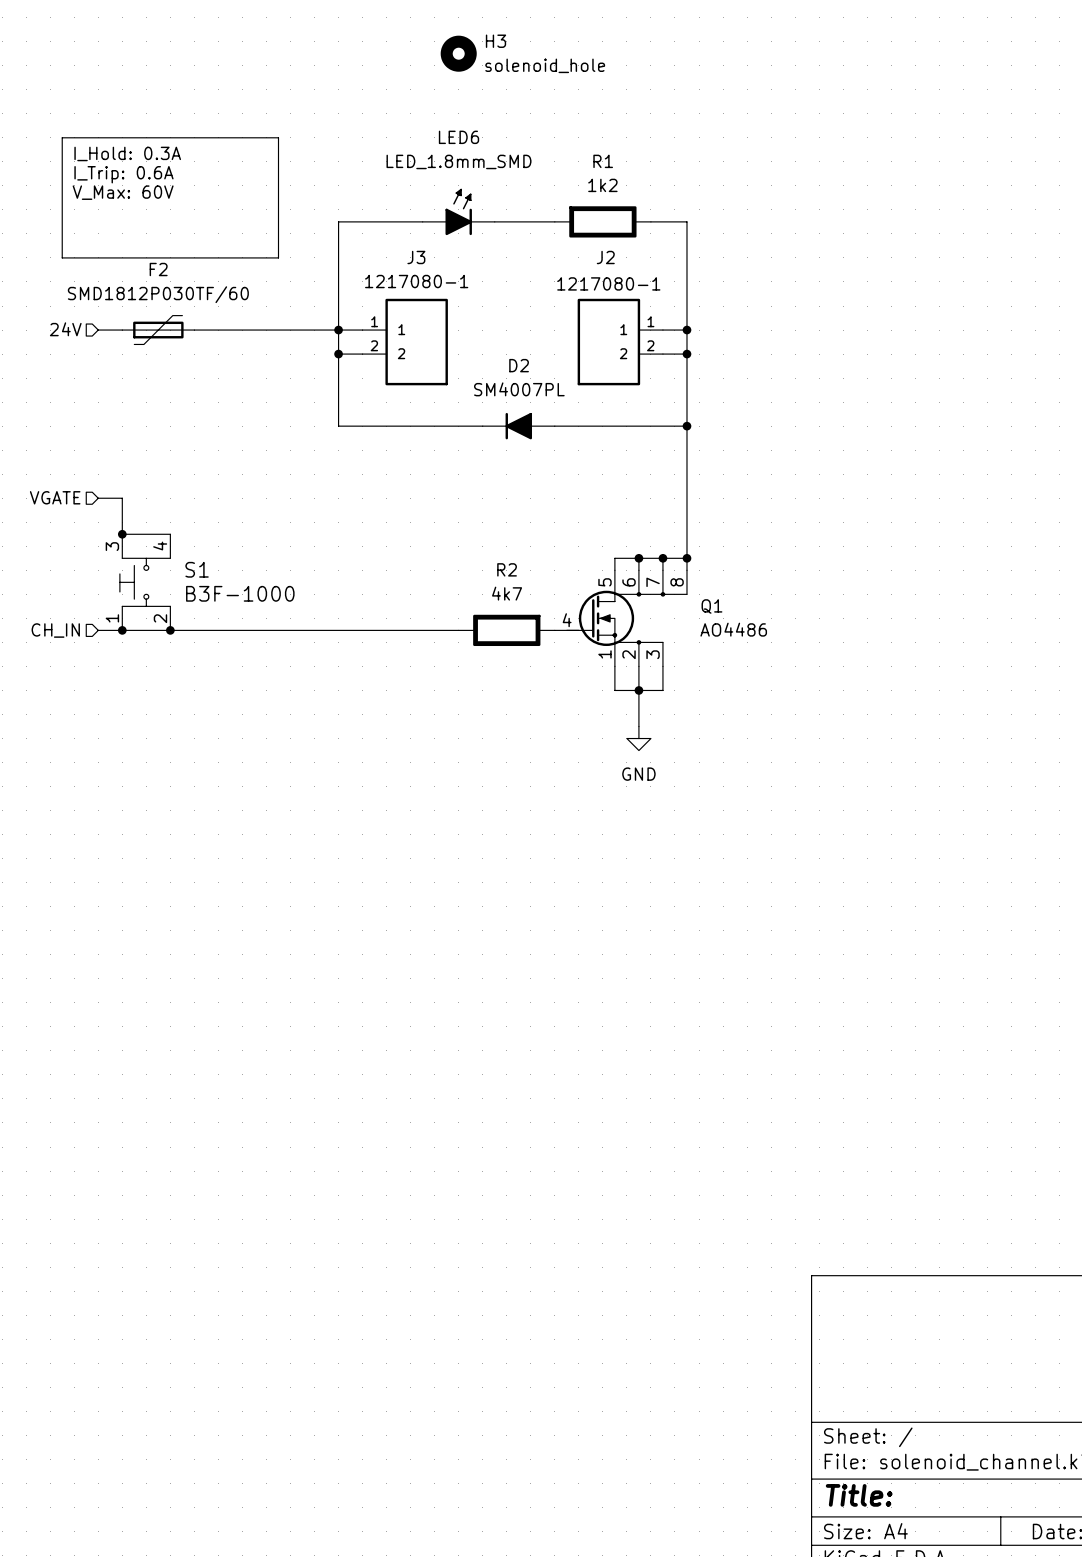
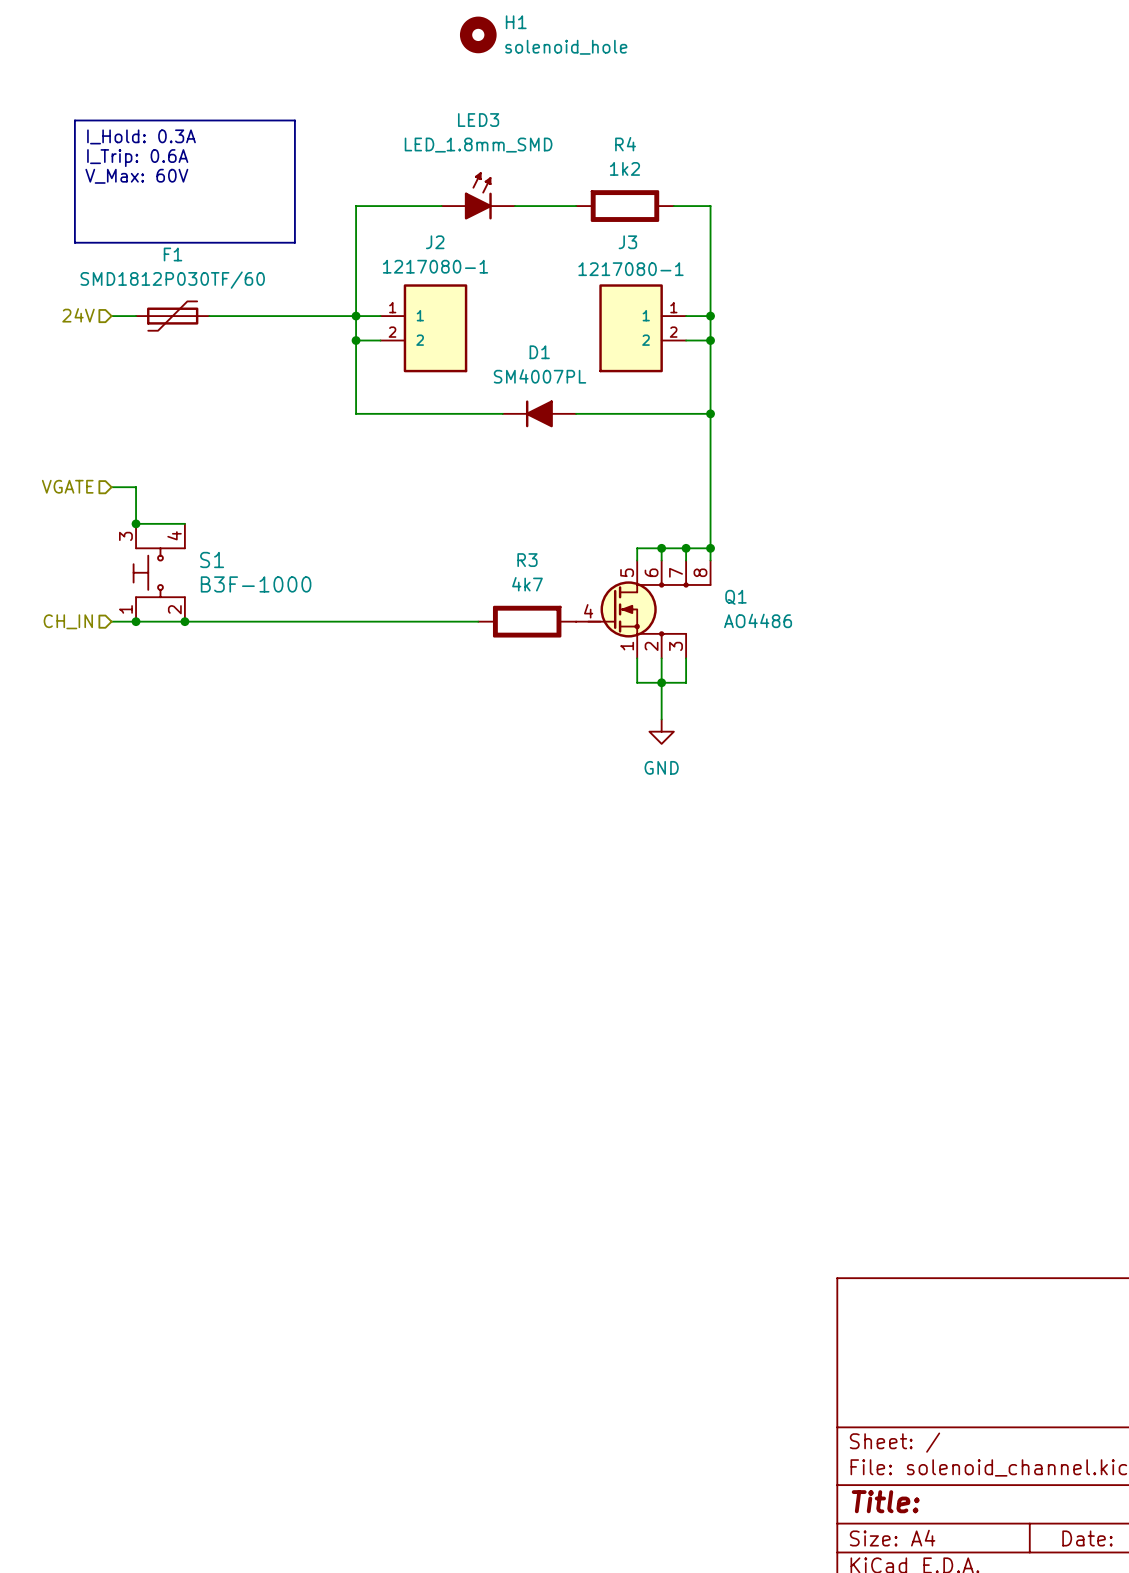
H3 name: H3 (495, 41) -> H1 (516, 22)
LED6 name: LED6 (459, 137) -> LED3 (478, 120)
R1 name: R1 (603, 161) -> R4 (625, 144)
J3 name: J3 (416, 257) -> J2 (435, 242)
J2 name: J2 (605, 257) -> J3 (627, 242)
F2 name: F2 (158, 269) -> F1 (172, 254)
D2 name: D2 (519, 365) -> D1 (539, 352)
R2 name: R2 (507, 569) -> R3 (527, 560)

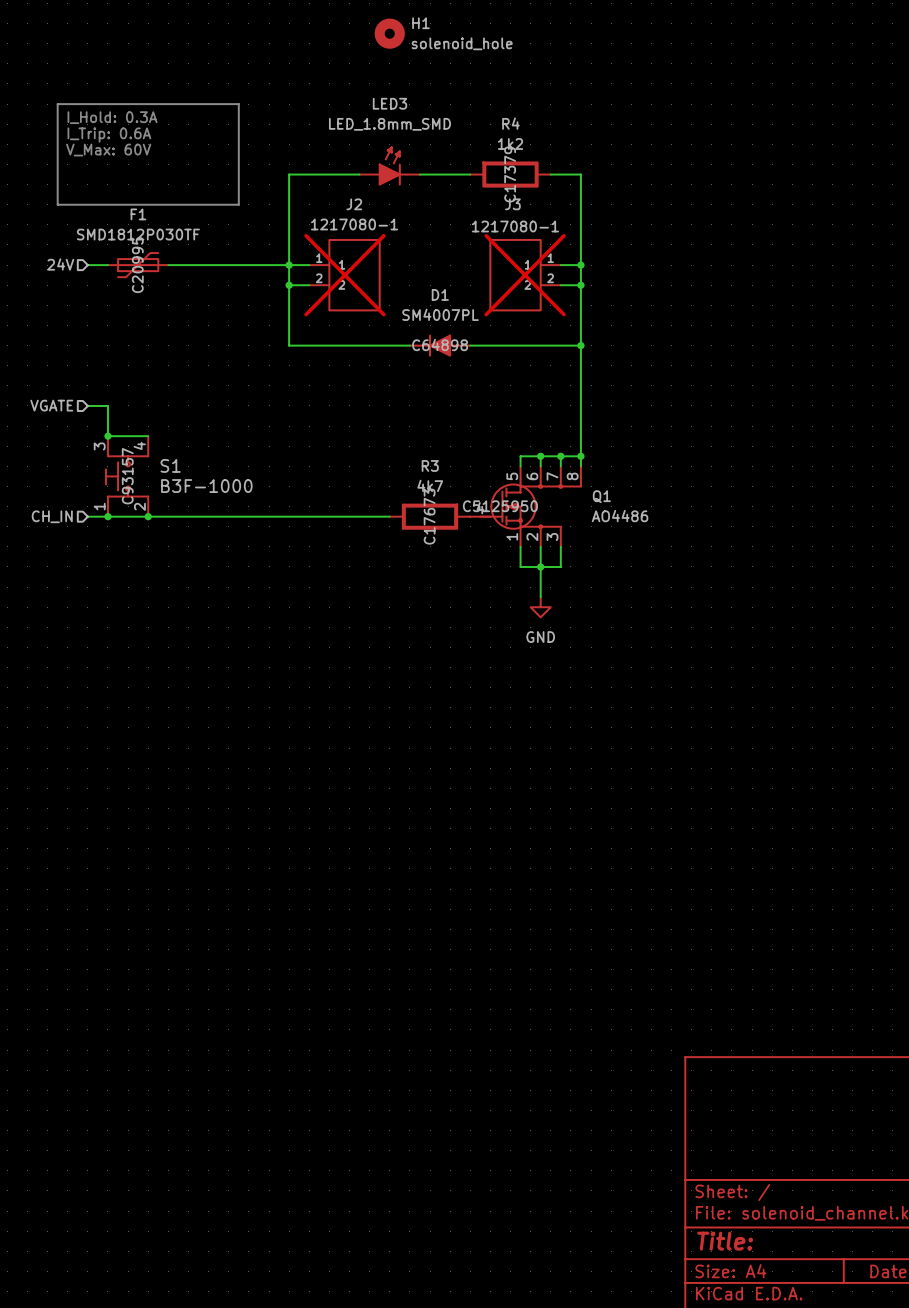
R4 text: none -> C17379 (510, 174)
F1 value: SMD1812P030TF/60 (172, 280) -> SMD1812P030TF (138, 234)
F1 text: none -> C20995 (137, 265)
J2 do-not-place cross: none -> (344, 275)
J3 do-not-place cross: none -> (525, 275)
D1 text: none -> C64898 (440, 345)
S1 text: none -> C93157 (127, 476)
Q1 text: none -> C5125950 (500, 506)
R3 text: none -> C17673 (429, 516)

